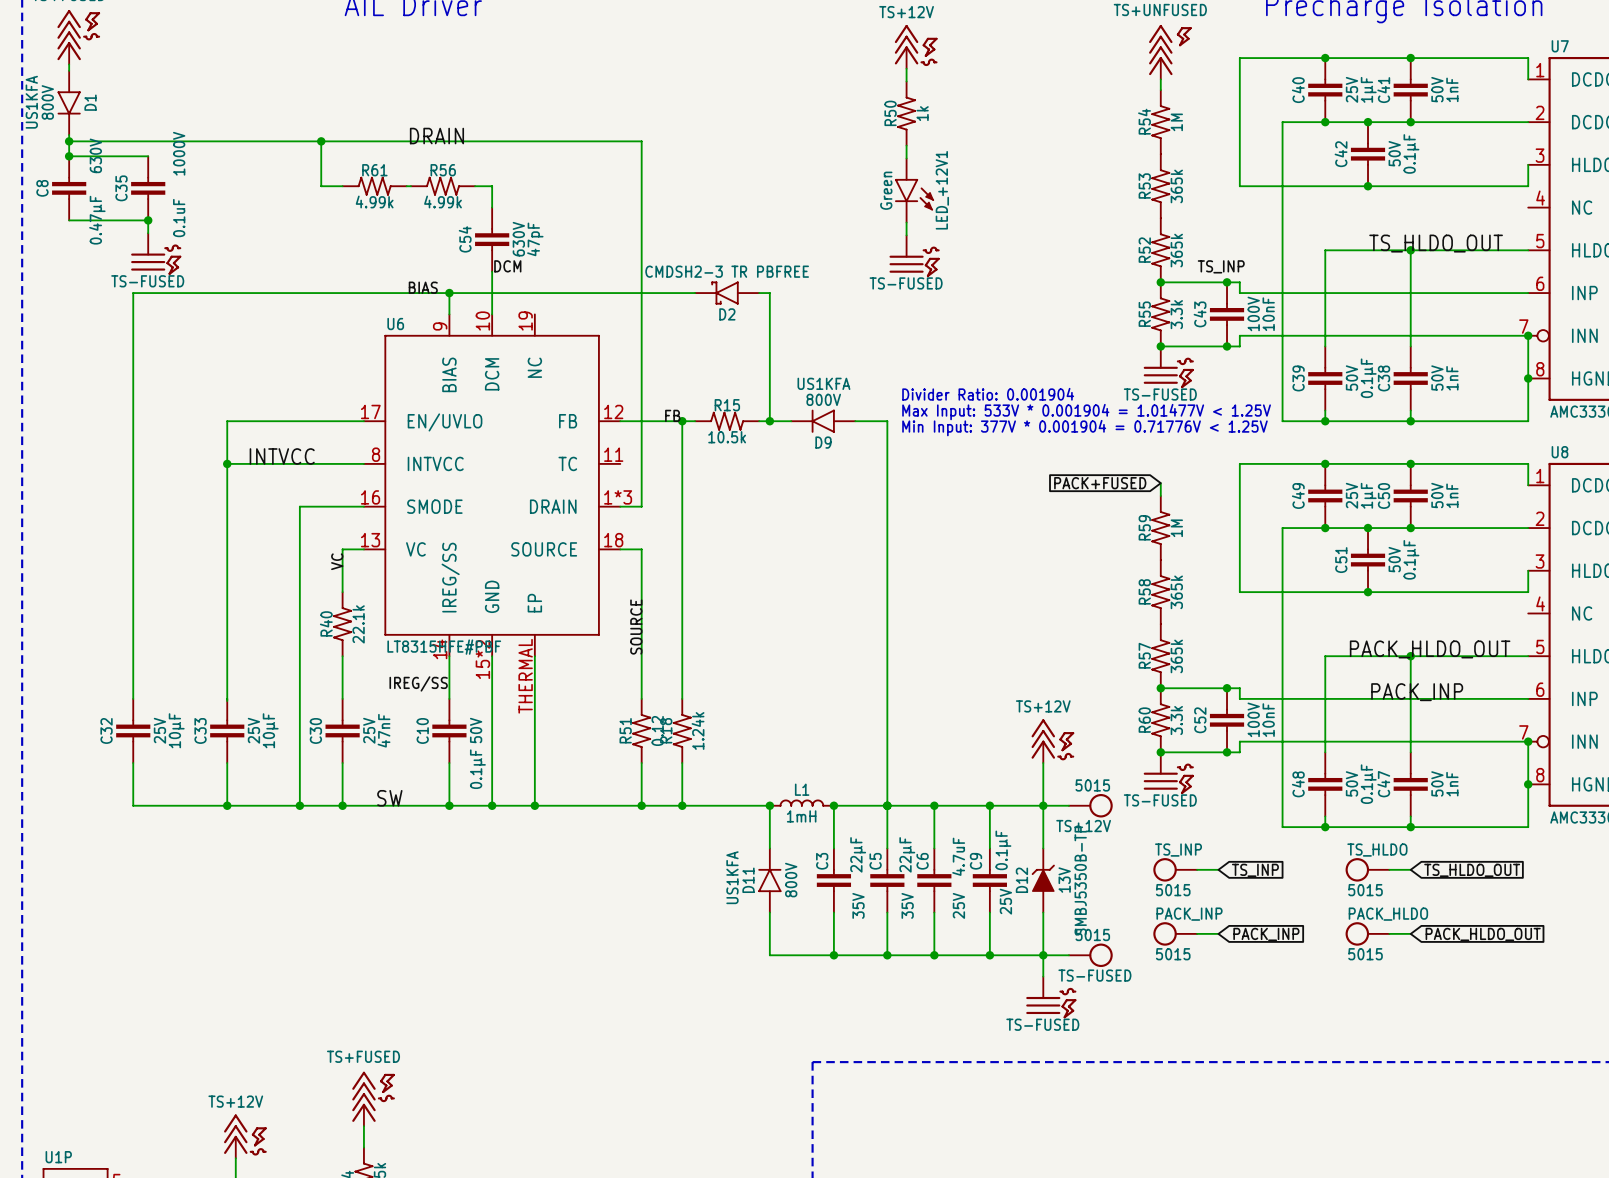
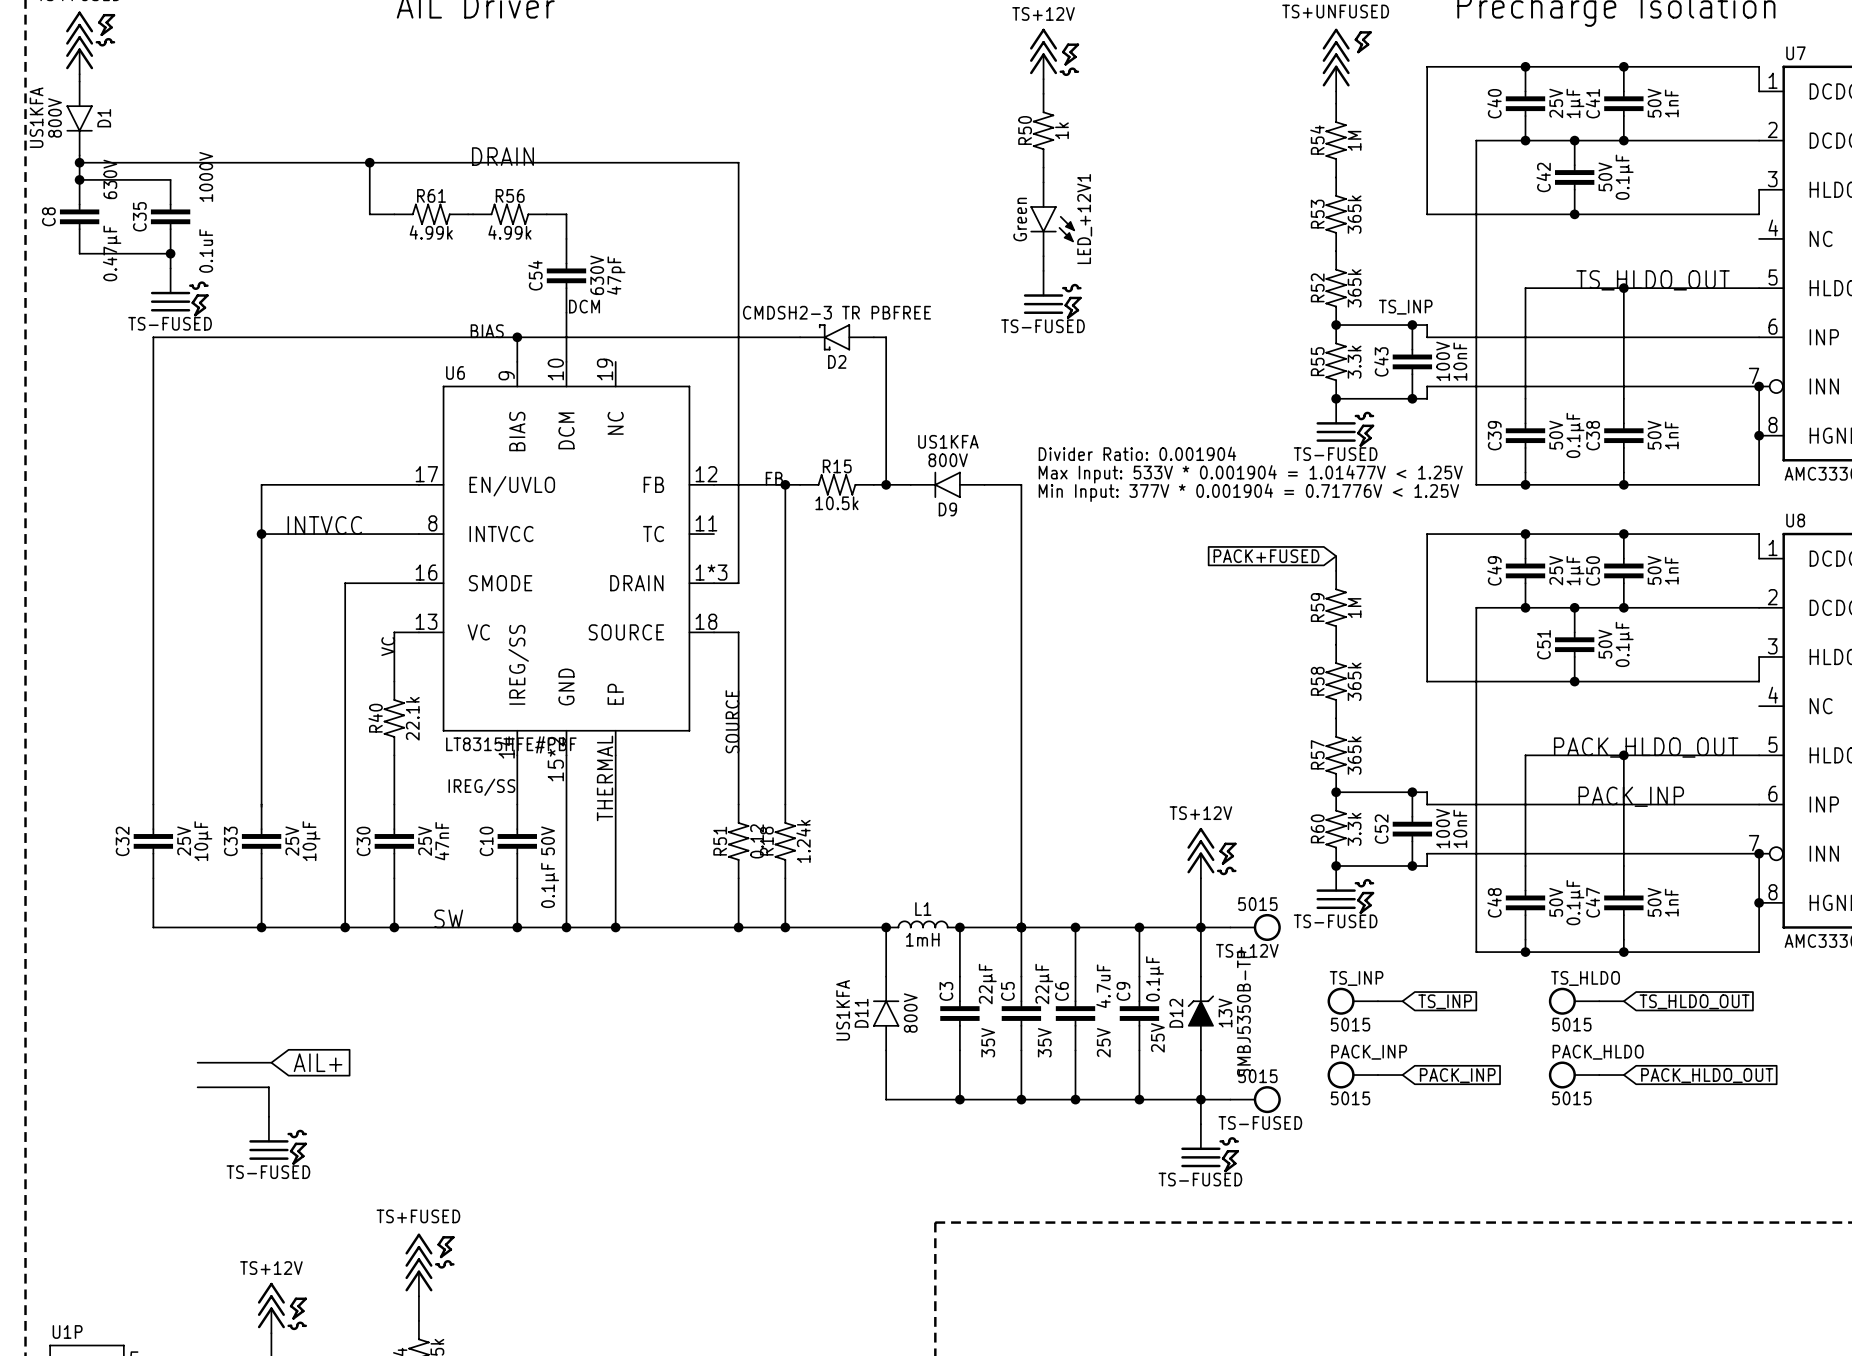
wire: none -> (197, 1062) (271, 1062)
global label: none -> AIL+ (318, 1062)
wire: none -> (197, 1087) (268, 1087) (268, 1116)
power symbol: none -> TS-FUSED (278, 1140)

